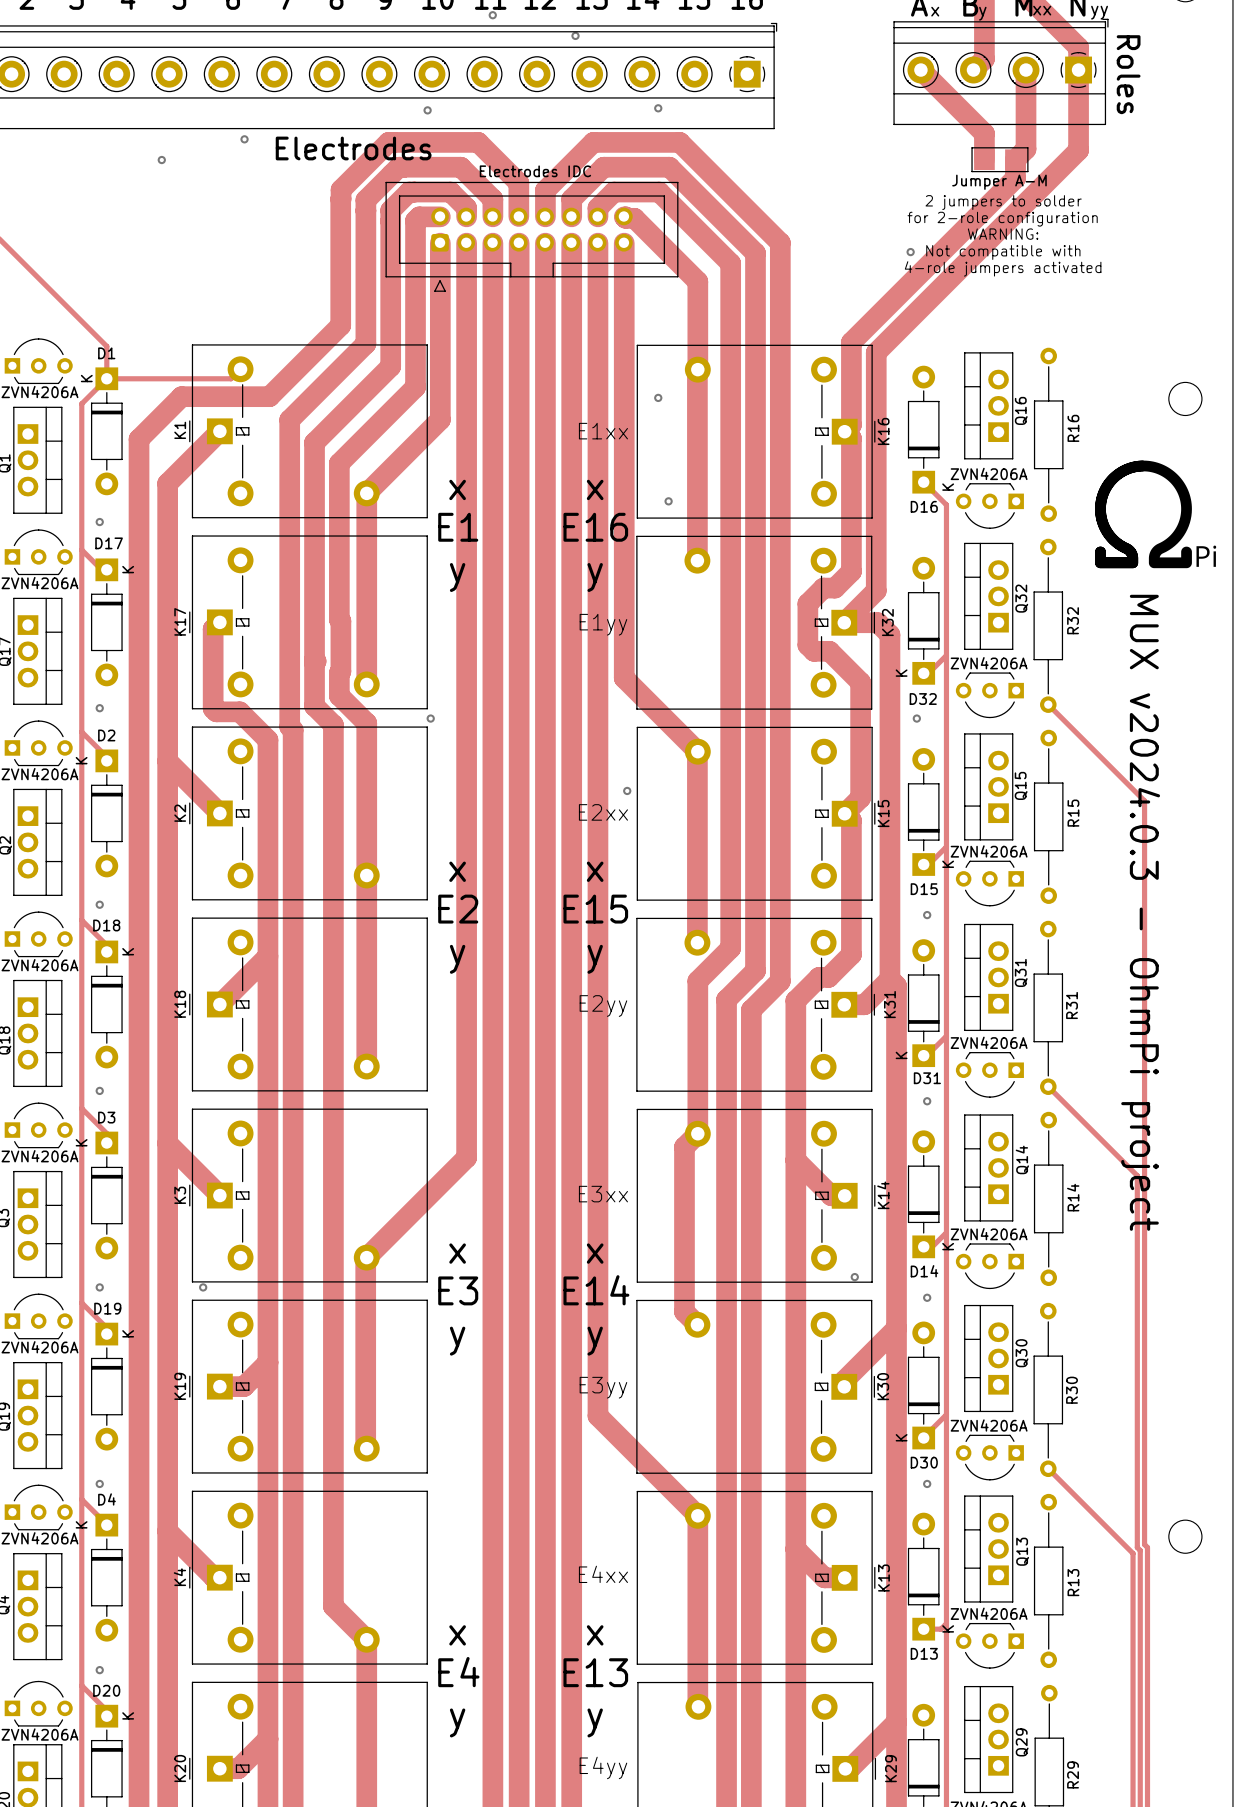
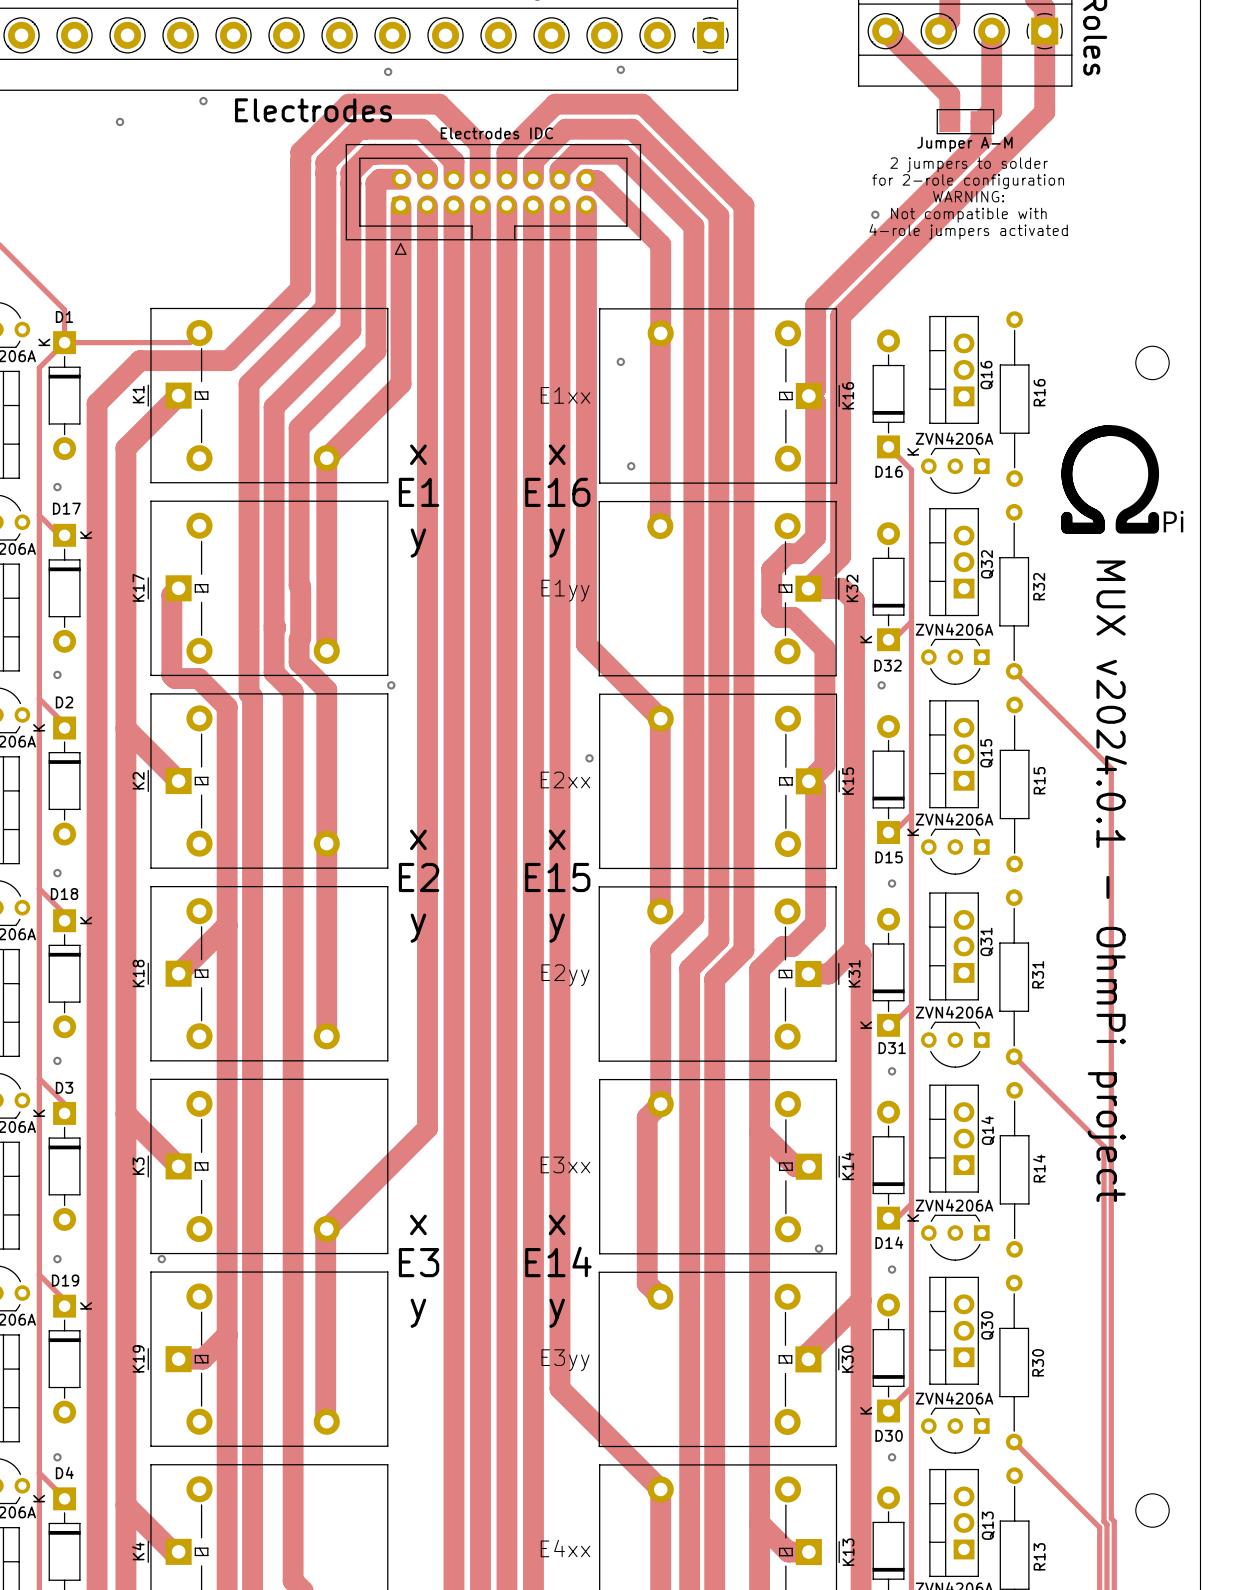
text: MUX v2024.0.3 - OhmPi project (1140, 912) -> MUX v2024.0.1 - OhmPi project (1107, 881)

